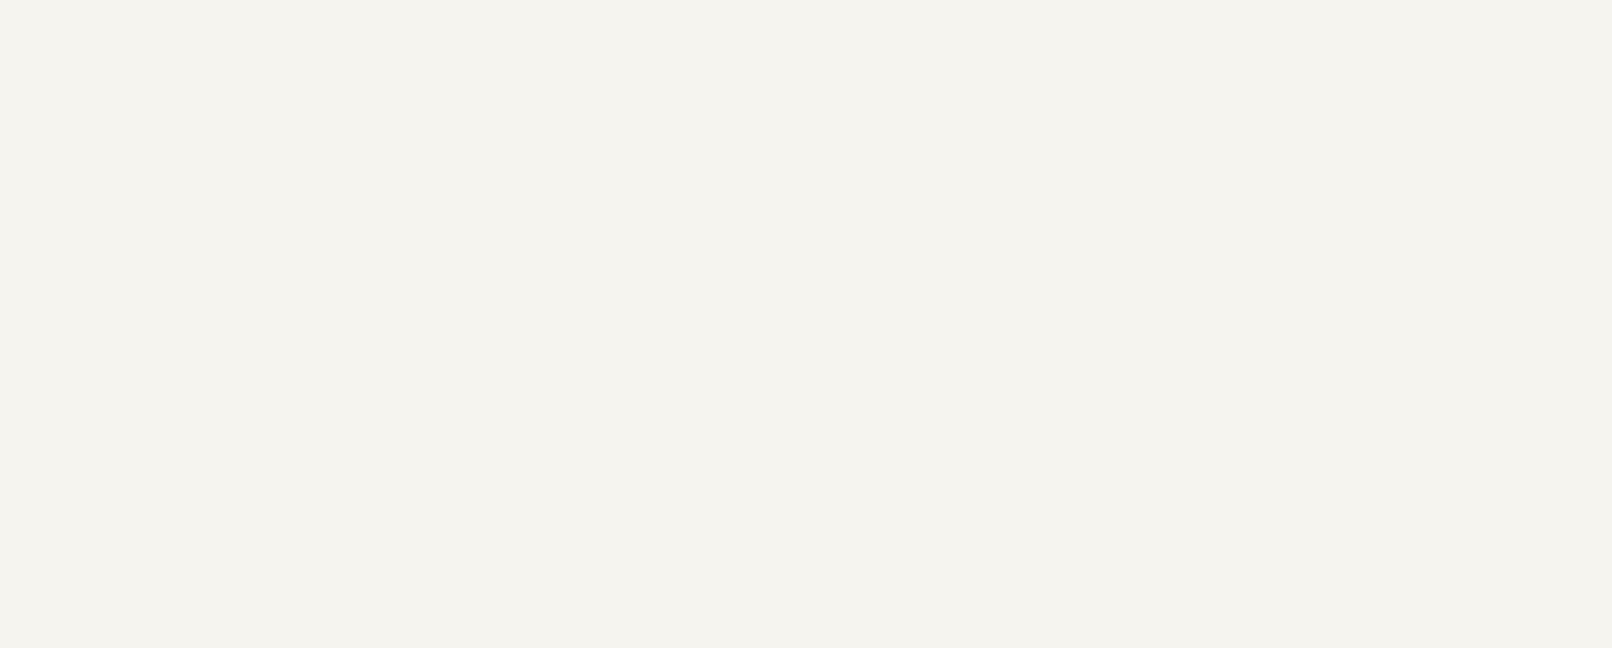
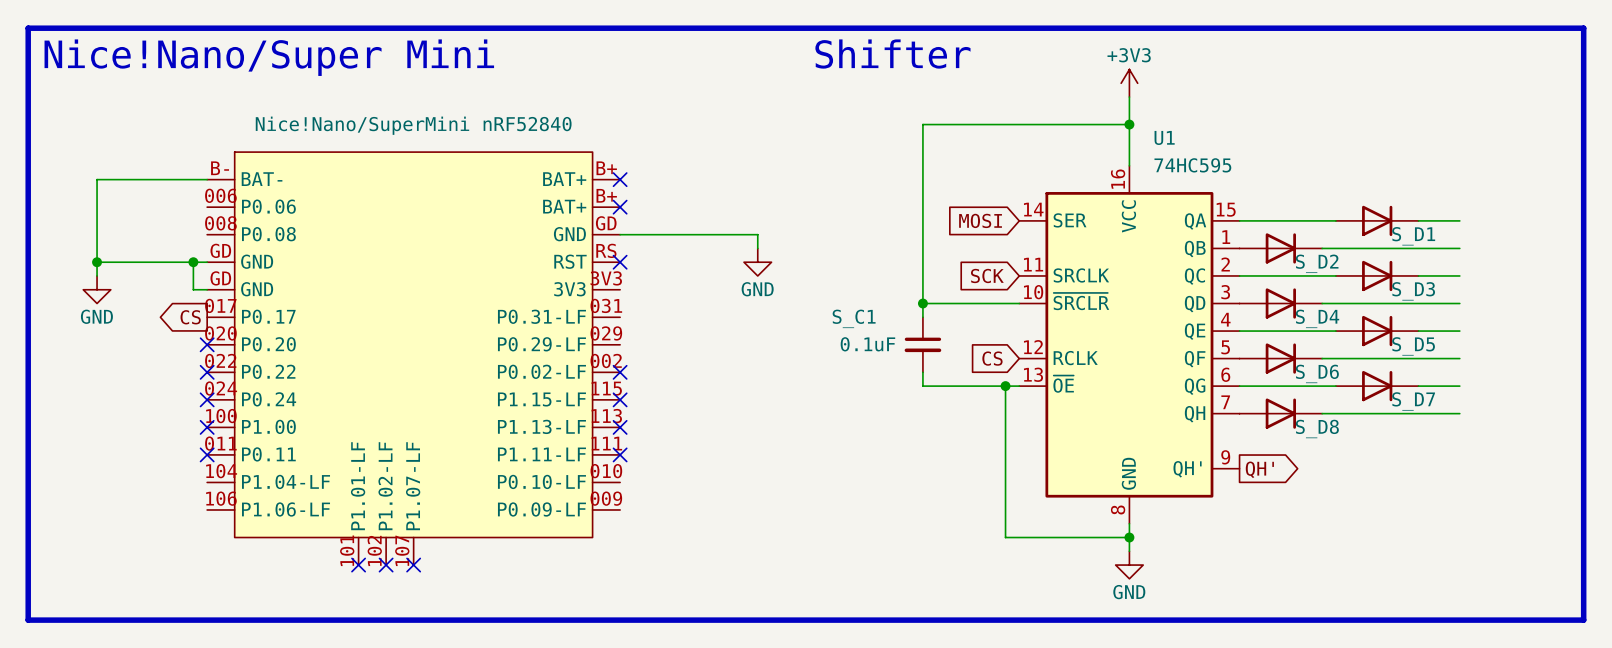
line: none -> (28, 28) (28, 620) (1583, 620) (1583, 28) (28, 28)
text: none -> Shifter (892, 54)
text: none -> Nice!Nano/Super Mini (269, 57)
power symbol: none -> +3V3 (1129, 83)
wire: none -> (1129, 97) (1129, 165)
wire: none -> (1129, 124) (922, 124) (922, 317)
junction: none -> (1129, 124)
wire: none -> (207, 179) (97, 179) (97, 275)
no-connect mark: none -> (620, 179)
no-connect mark: none -> (620, 207)
global label: none -> MOSI (980, 220)
wire: none -> (1239, 220) (1335, 220)
S_D1: none -> (1377, 220)
wire: none -> (1418, 220) (1459, 220)
wire: none -> (620, 234) (757, 234) (757, 248)
S_D2: none -> (1280, 248)
wire: none -> (1322, 248) (1459, 248)
wire: none -> (97, 262) (207, 262)
junction: none -> (97, 262)
wire: none -> (193, 262) (193, 289) (207, 289)
junction: none -> (193, 262)
no-connect mark: none -> (620, 262)
power symbol: none -> GND (757, 262)
global label: none -> SCK (987, 275)
wire: none -> (1239, 275) (1335, 275)
S_D3: none -> (1377, 275)
wire: none -> (1418, 275) (1459, 275)
power symbol: none -> GND (97, 289)
wire: none -> (922, 303) (1019, 303)
junction: none -> (922, 303)
S_D4: none -> (1280, 303)
wire: none -> (1322, 303) (1459, 303)
global label: none -> CS (190, 317)
wire: none -> (1239, 331) (1335, 331)
S_D5: none -> (1377, 331)
wire: none -> (1418, 331) (1459, 331)
no-connect mark: none -> (207, 344)
S_C1: none -> 0.1uF (922, 344)
U1: none -> 74HC595 (1129, 344)
part: none -> Nice!Nano/SuperMini nRF52840 (413, 358)
global label: none -> CS (992, 358)
S_D6: none -> (1280, 358)
wire: none -> (1322, 358) (1459, 358)
no-connect mark: none -> (207, 372)
no-connect mark: none -> (620, 372)
wire: none -> (922, 372) (922, 386) (1019, 386)
wire: none -> (1005, 386) (1005, 537) (1129, 537)
junction: none -> (1005, 386)
wire: none -> (1239, 386) (1335, 386)
S_D7: none -> (1377, 386)
wire: none -> (1418, 386) (1459, 386)
no-connect mark: none -> (207, 399)
no-connect mark: none -> (620, 399)
S_D8: none -> (1280, 413)
wire: none -> (1322, 413) (1459, 413)
no-connect mark: none -> (207, 427)
no-connect mark: none -> (620, 427)
no-connect mark: none -> (207, 454)
no-connect mark: none -> (620, 454)
global label: none -> QH' (1259, 469)
wire: none -> (1129, 523) (1129, 551)
junction: none -> (1129, 537)
no-connect mark: none -> (358, 565)
no-connect mark: none -> (386, 565)
no-connect mark: none -> (413, 565)
power symbol: none -> GND (1129, 565)

